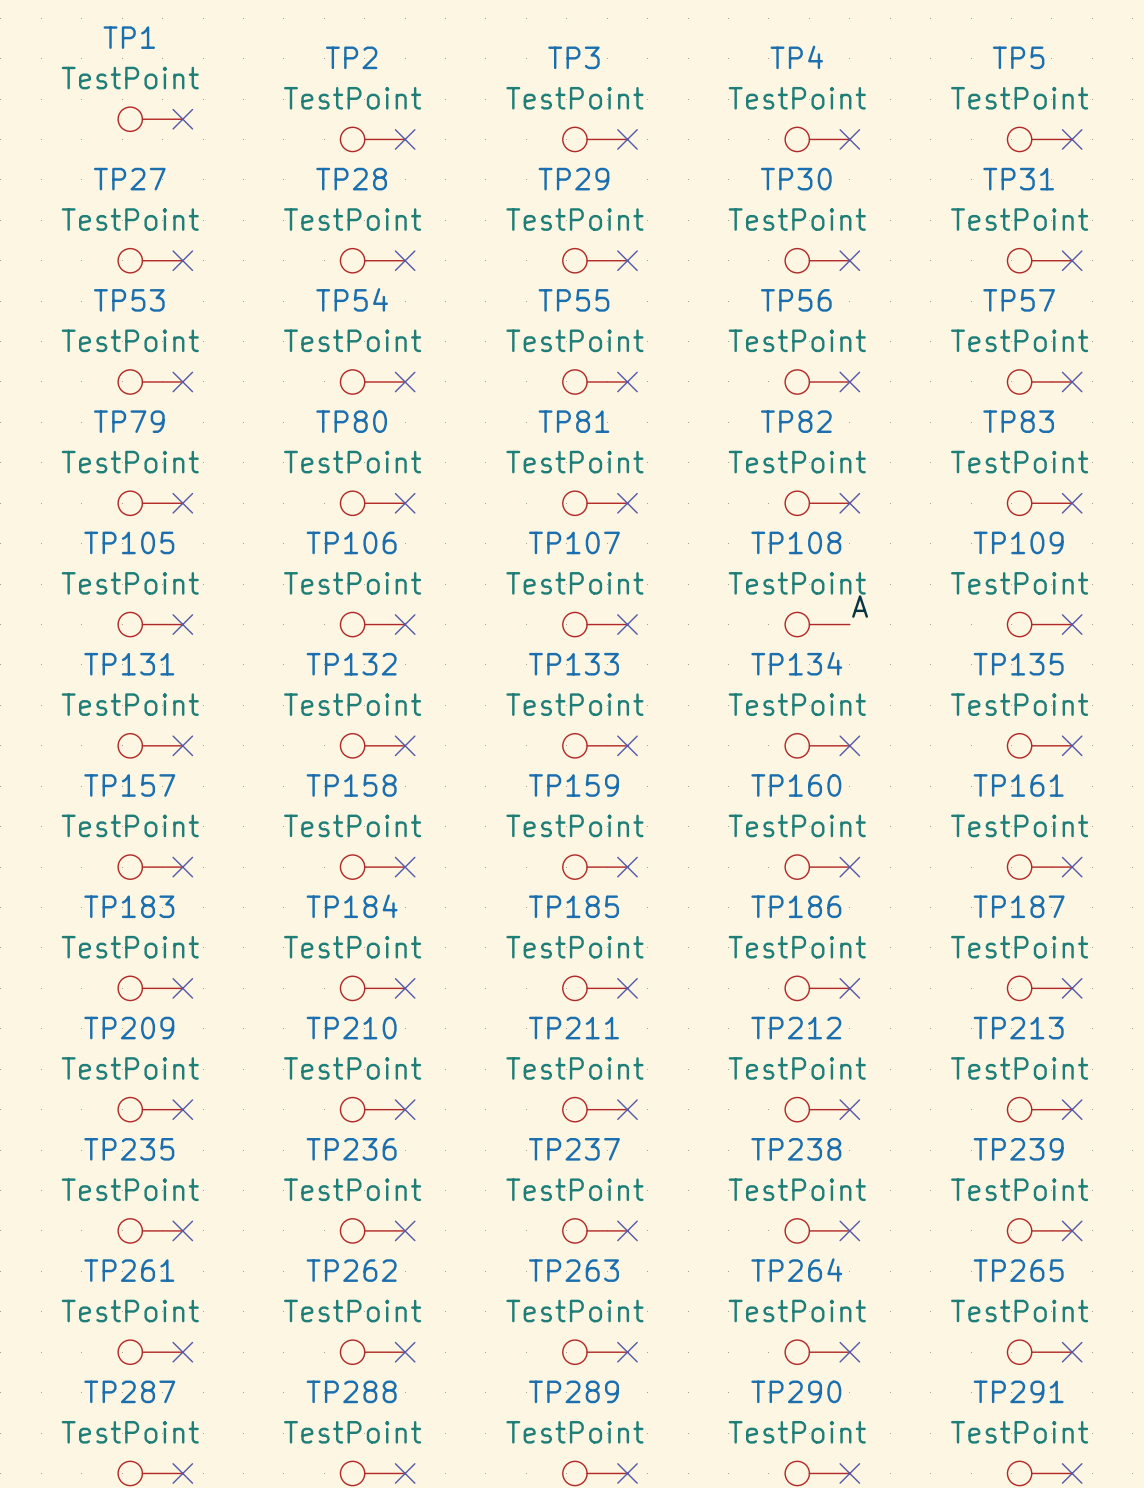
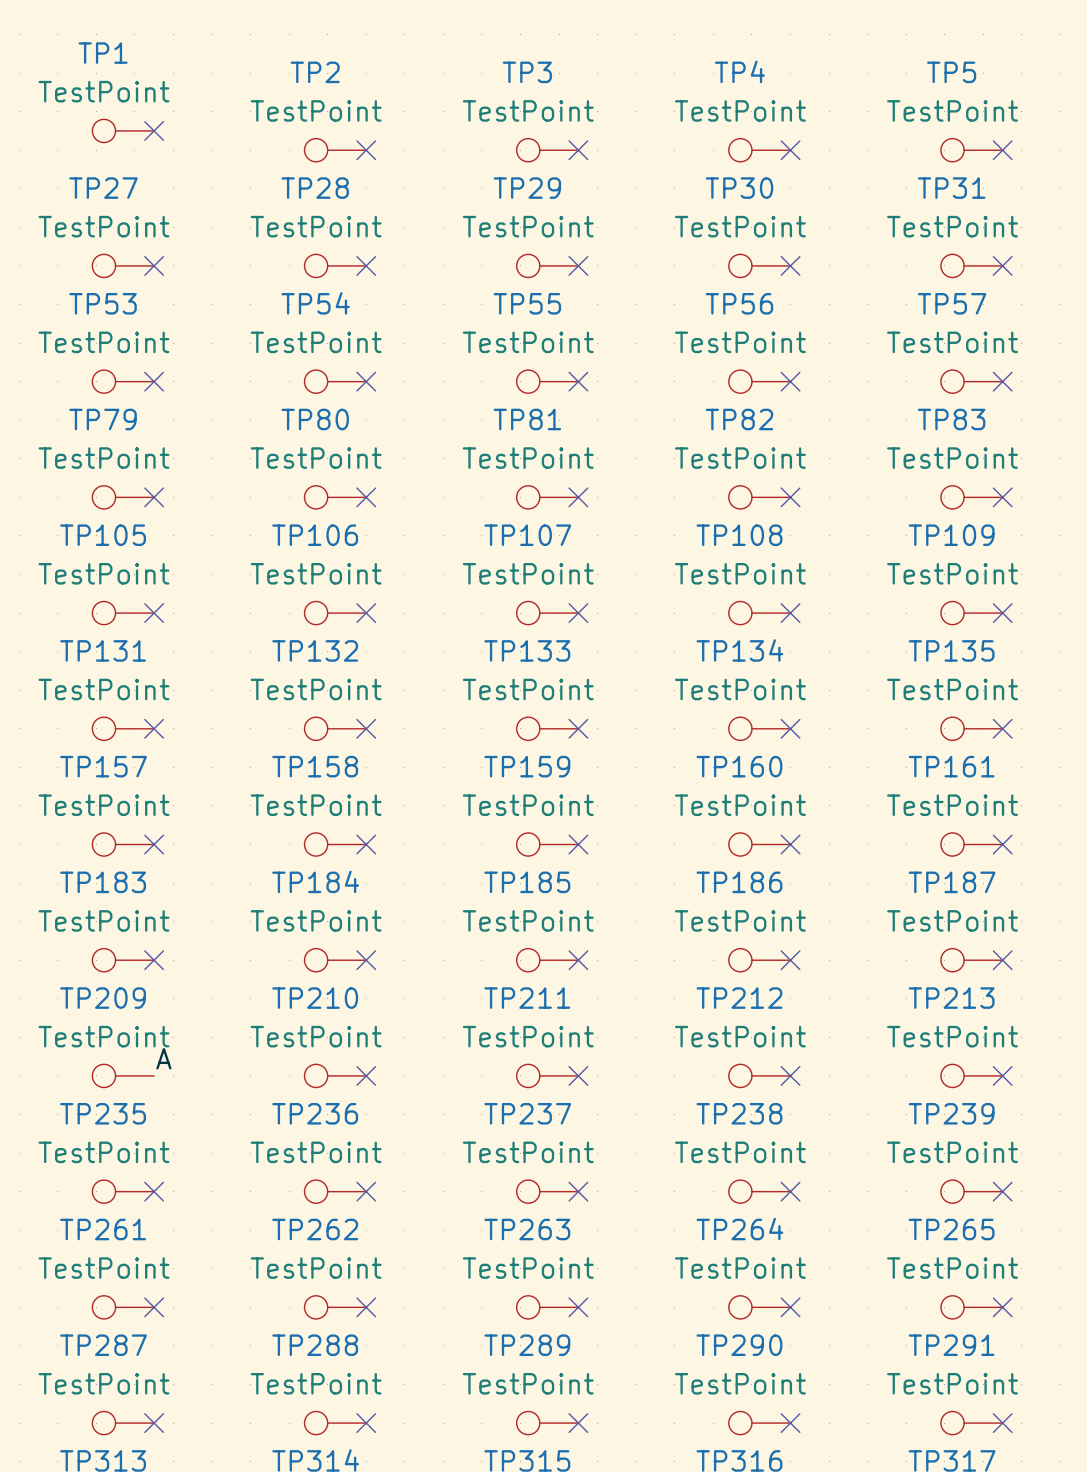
label: A (860, 606) -> none
no-connect mark: none -> (790, 613)
label: none -> A (163, 1058)
no-connect mark: (182, 1109) -> none

